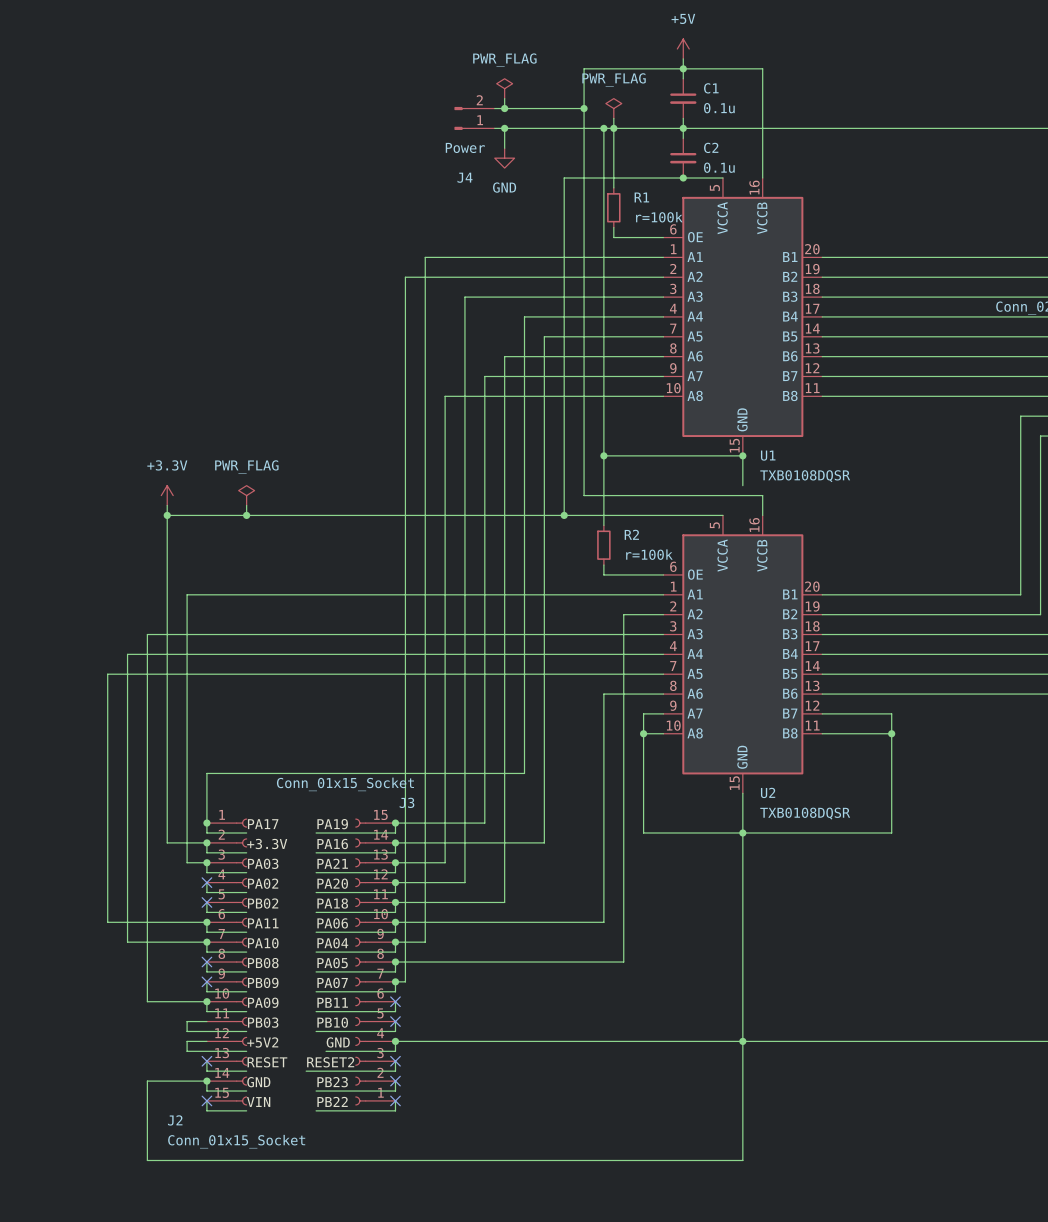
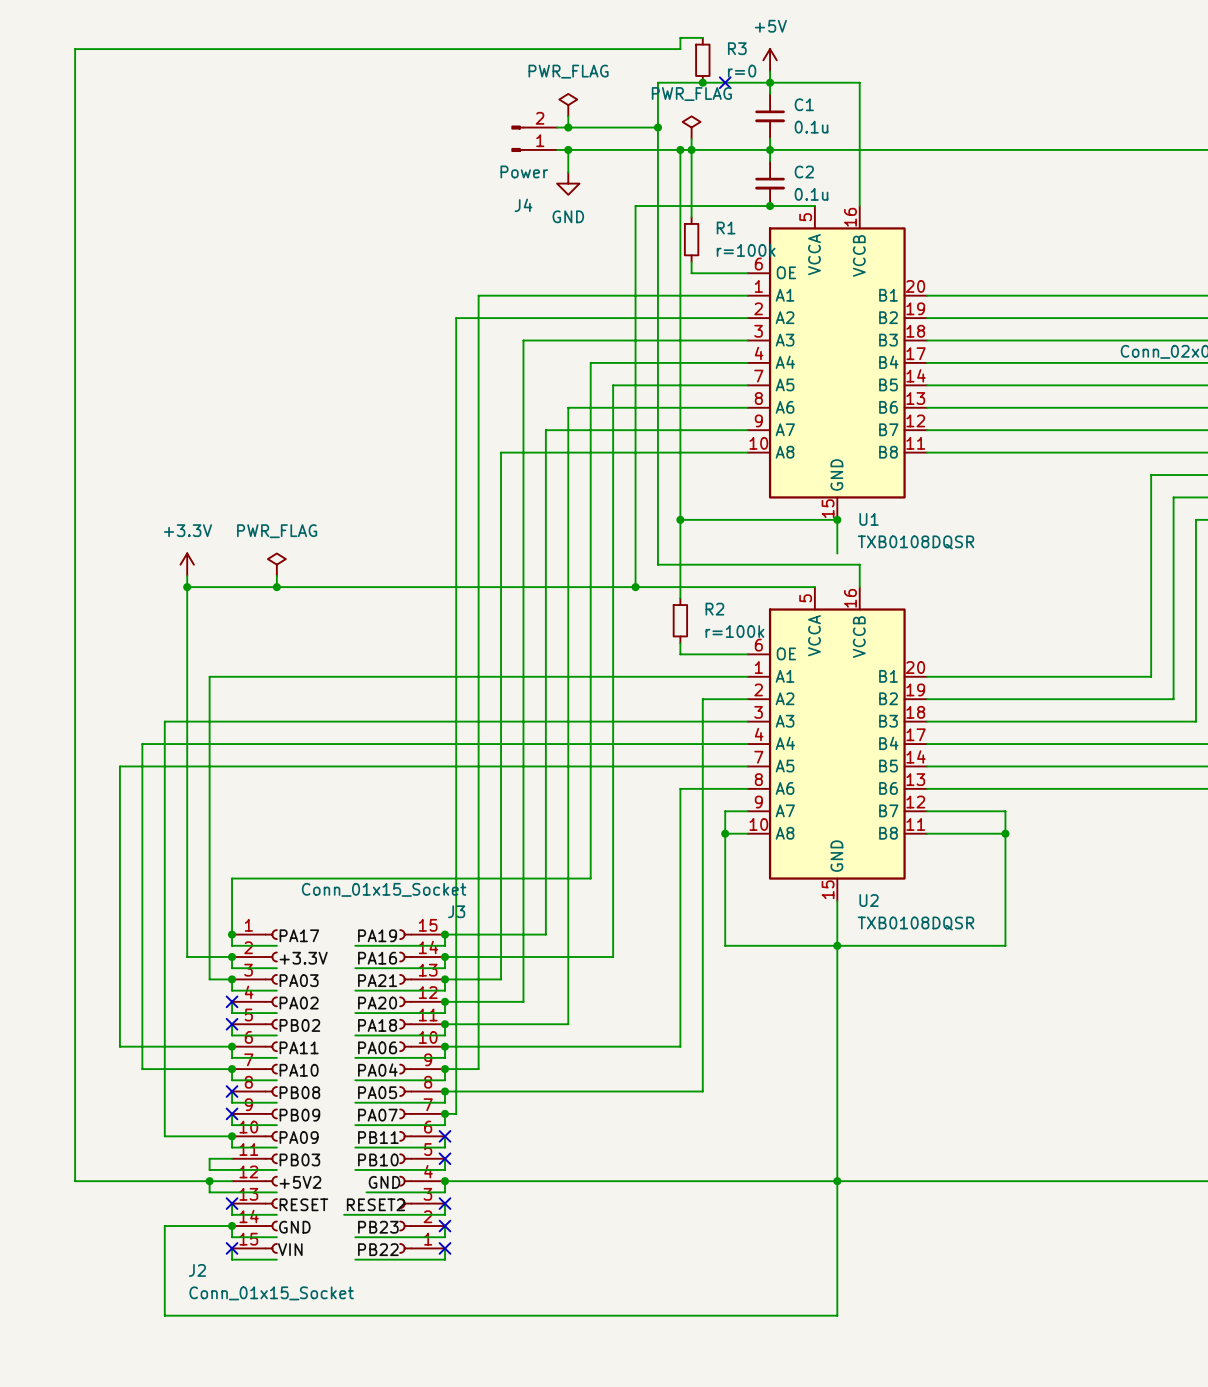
wire: none -> (702, 37) (680, 37) (680, 49) (75, 49) (75, 1181) (209, 1181)
R3: none -> r=0 (702, 60)
junction: none -> (702, 82)
no-connect mark: none -> (725, 82)
junction: none -> (209, 1181)

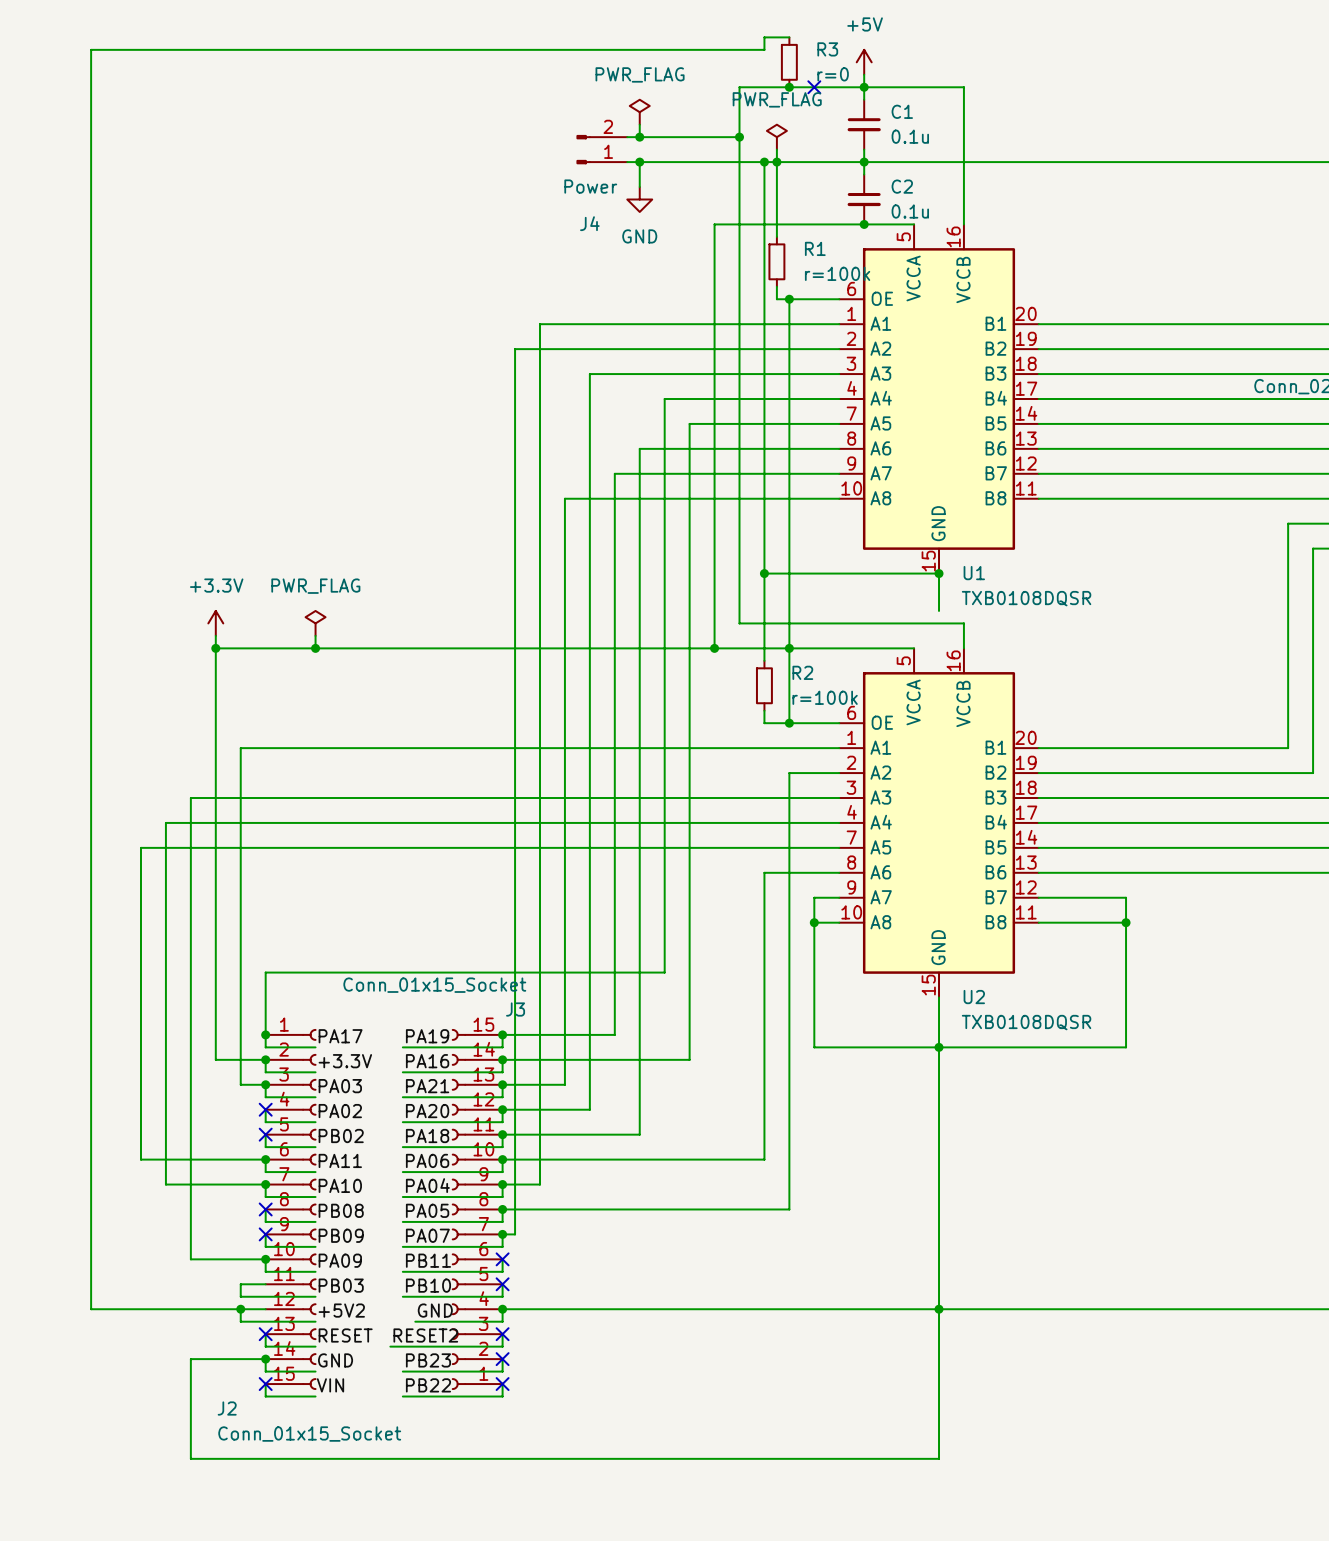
wire: none -> (789, 299) (789, 723)
junction: none -> (789, 299)
junction: none -> (789, 648)
junction: none -> (789, 723)

